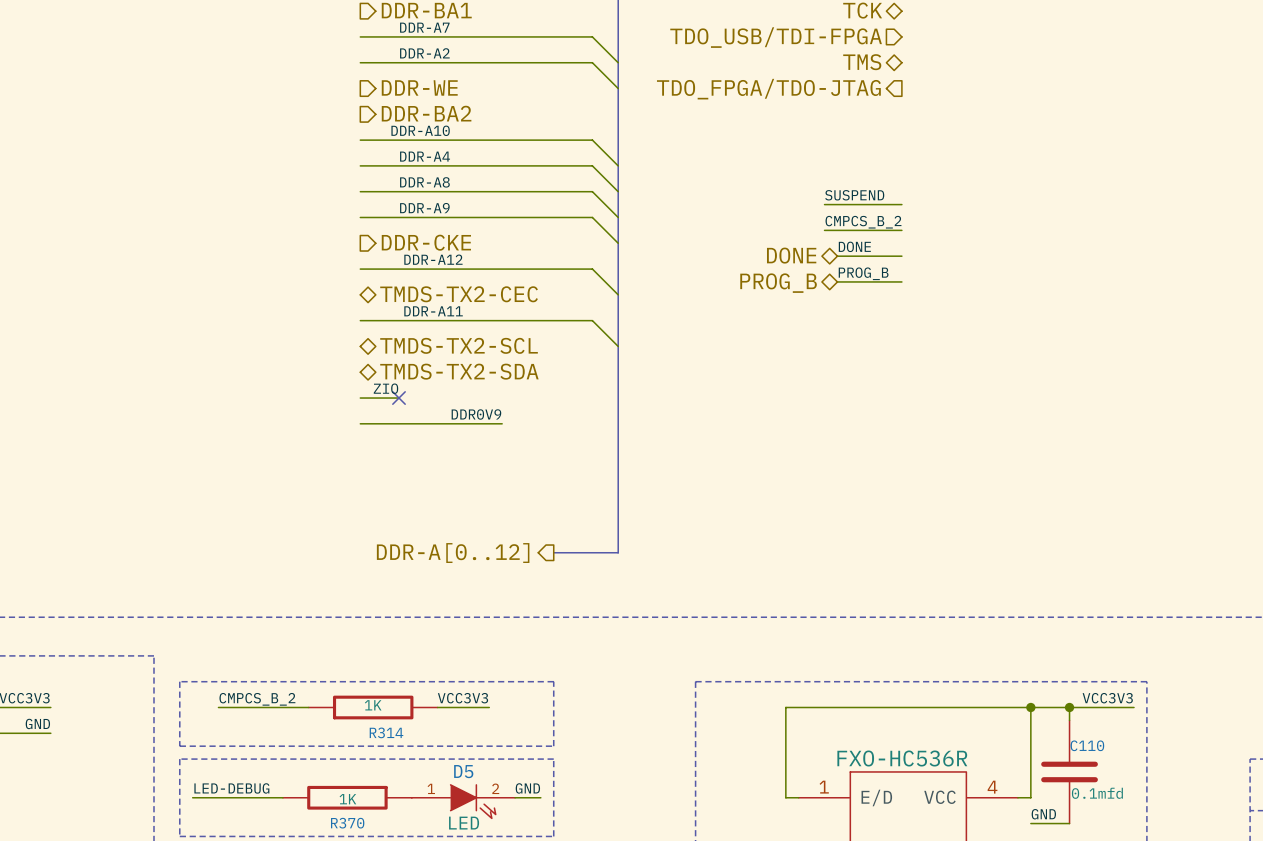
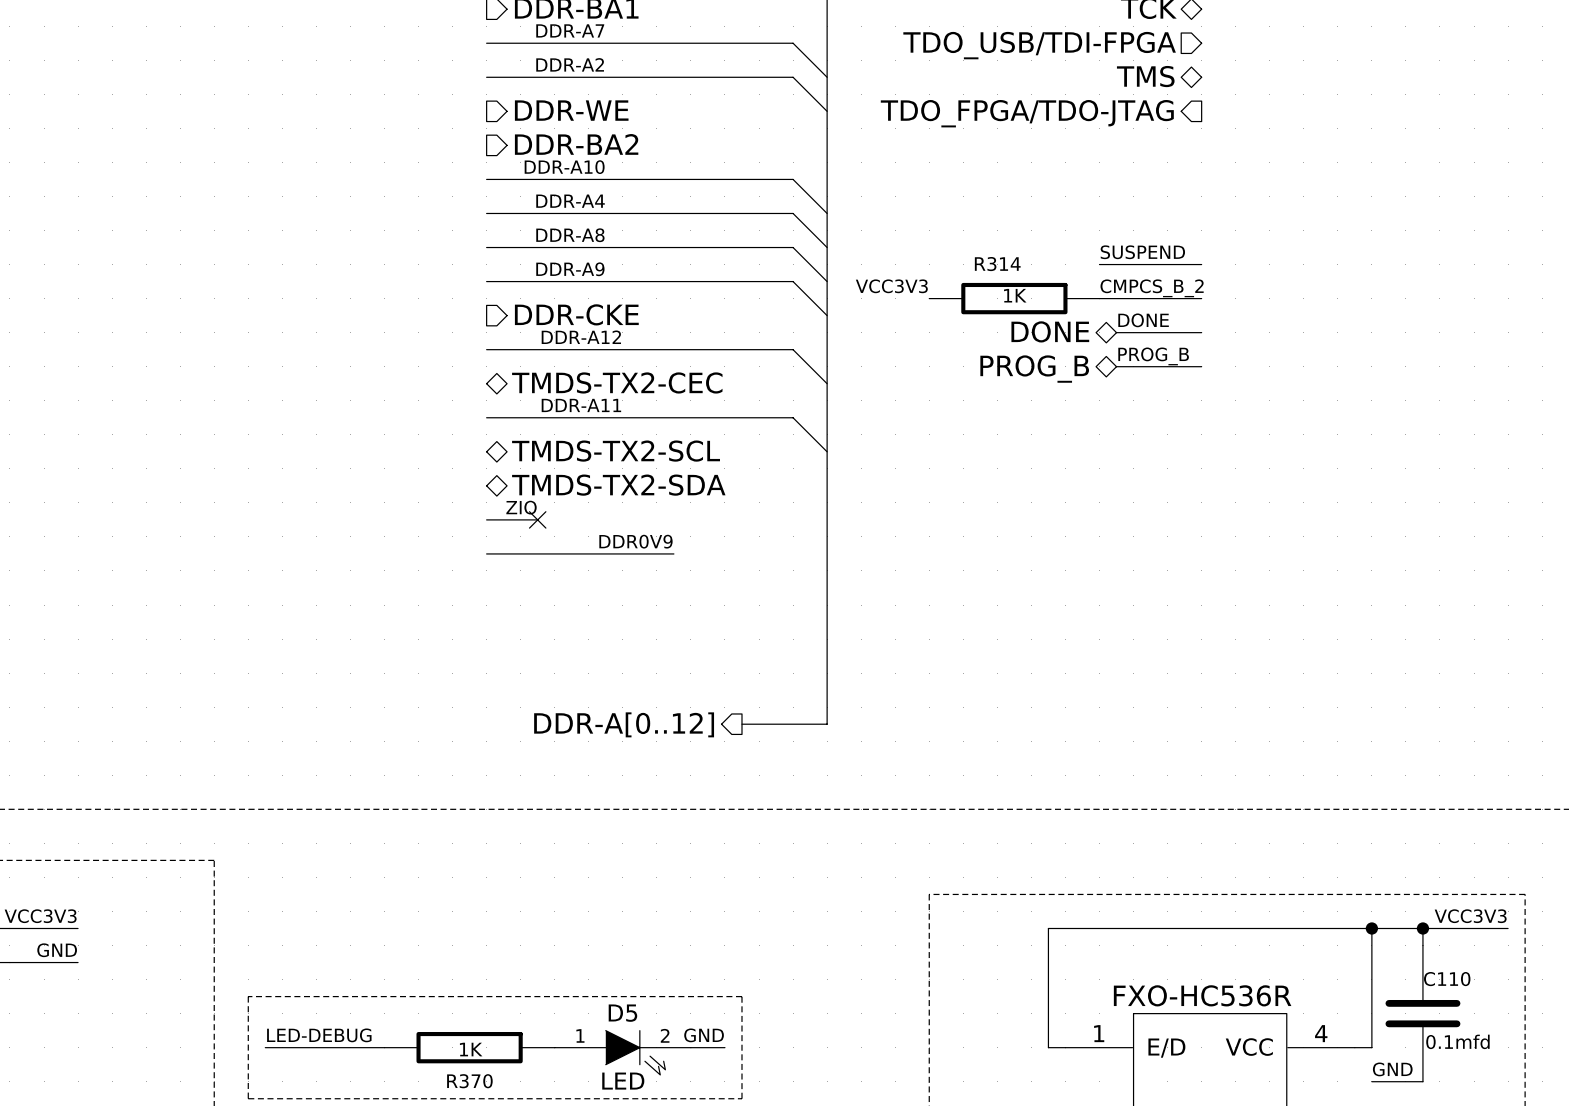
label: none -> VCC3V3 (891, 286)
line: (179, 681) (179, 746) (553, 746) (553, 681) (179, 681) -> none
label: VCC3V3 (462, 698) -> none
label: CMPCS_B_2 (257, 699) -> none
wire: (218, 707) (308, 707) -> none
R314 position: (373, 707) -> (1014, 298)
wire: (437, 707) (489, 707) -> none
R314 name position: R314 (386, 732) -> R314 (997, 264)

